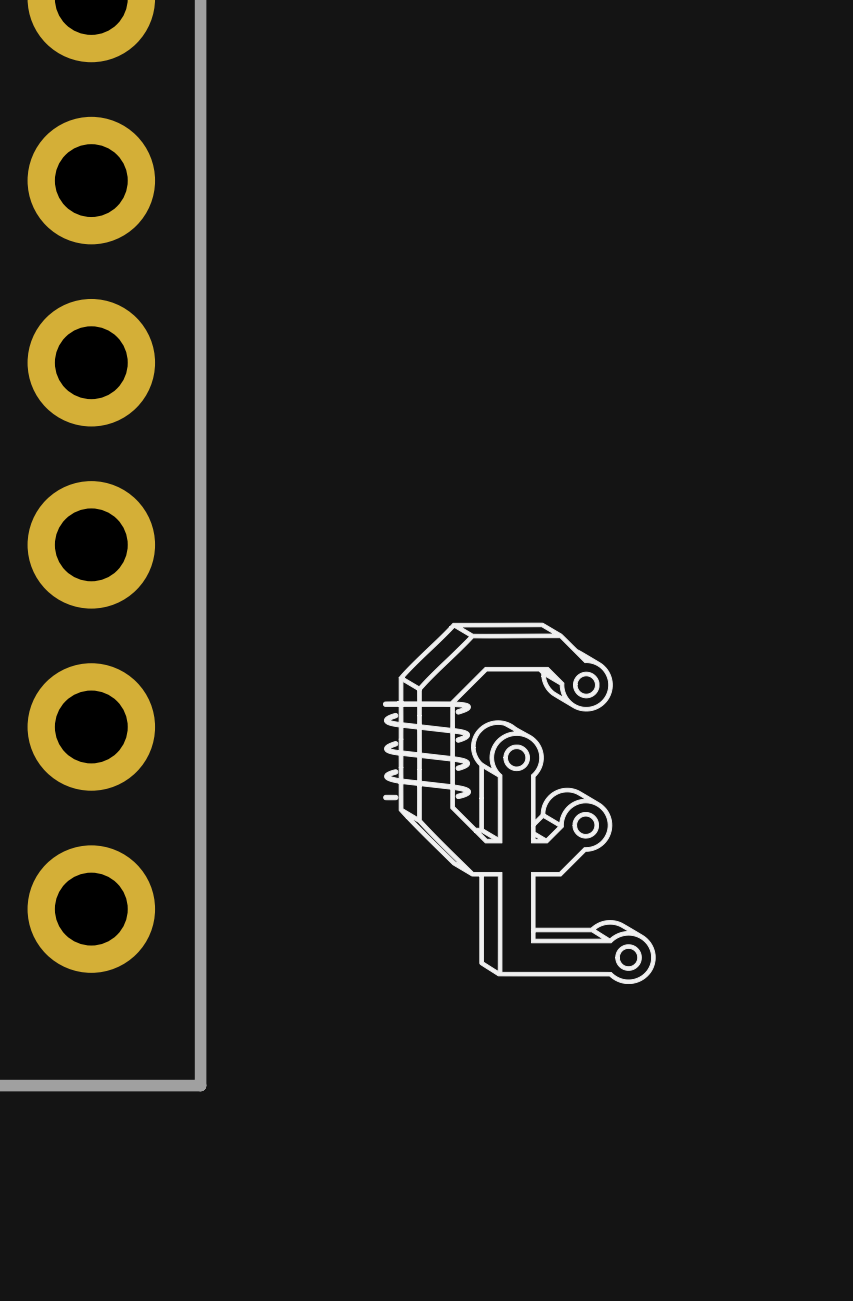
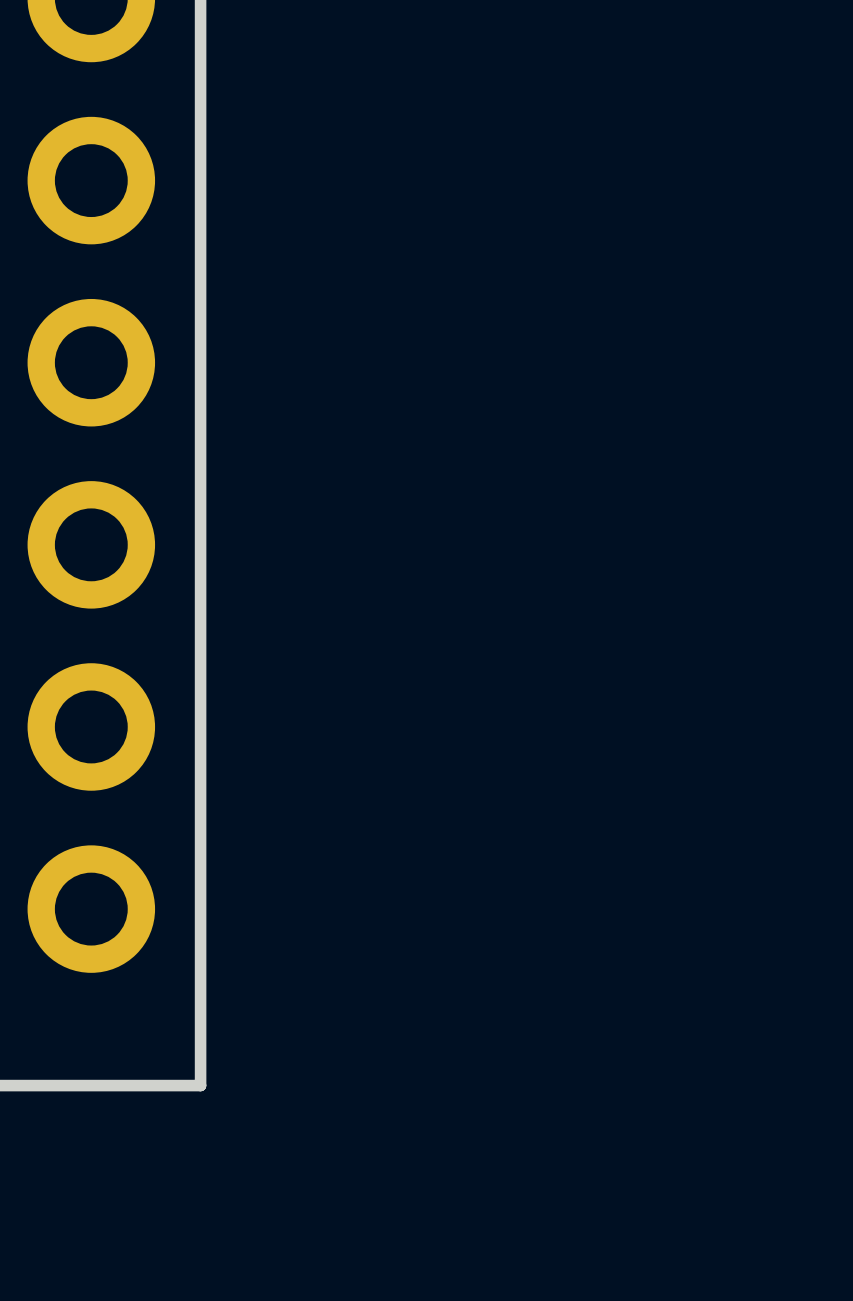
drawing: [382, 622, 656, 985] -> none

